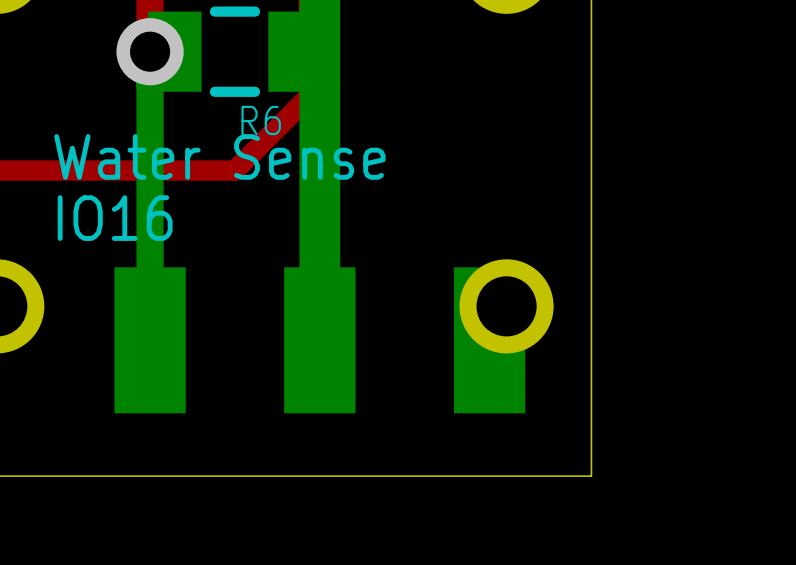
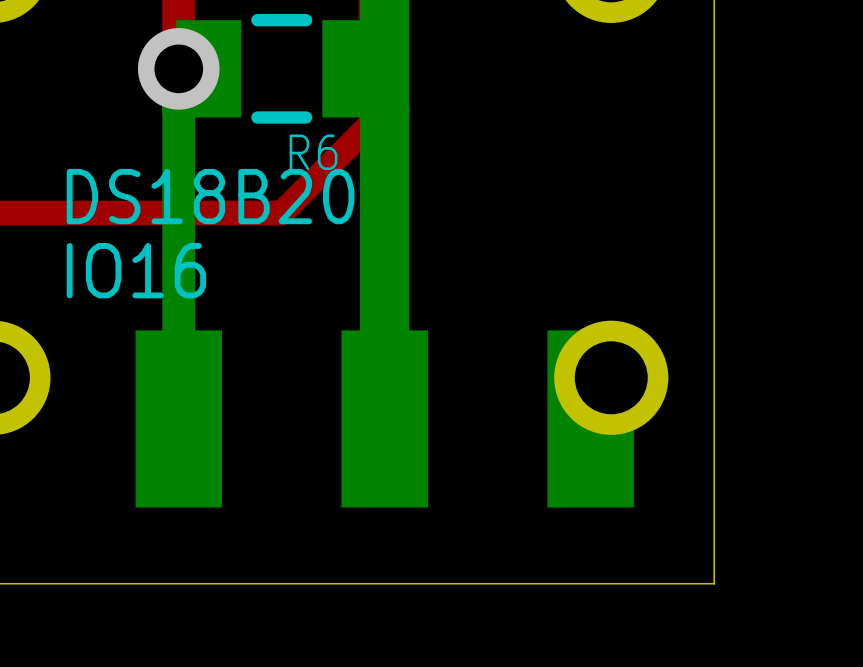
text: Water Sense (219, 156) -> DS18B20 (210, 196)

